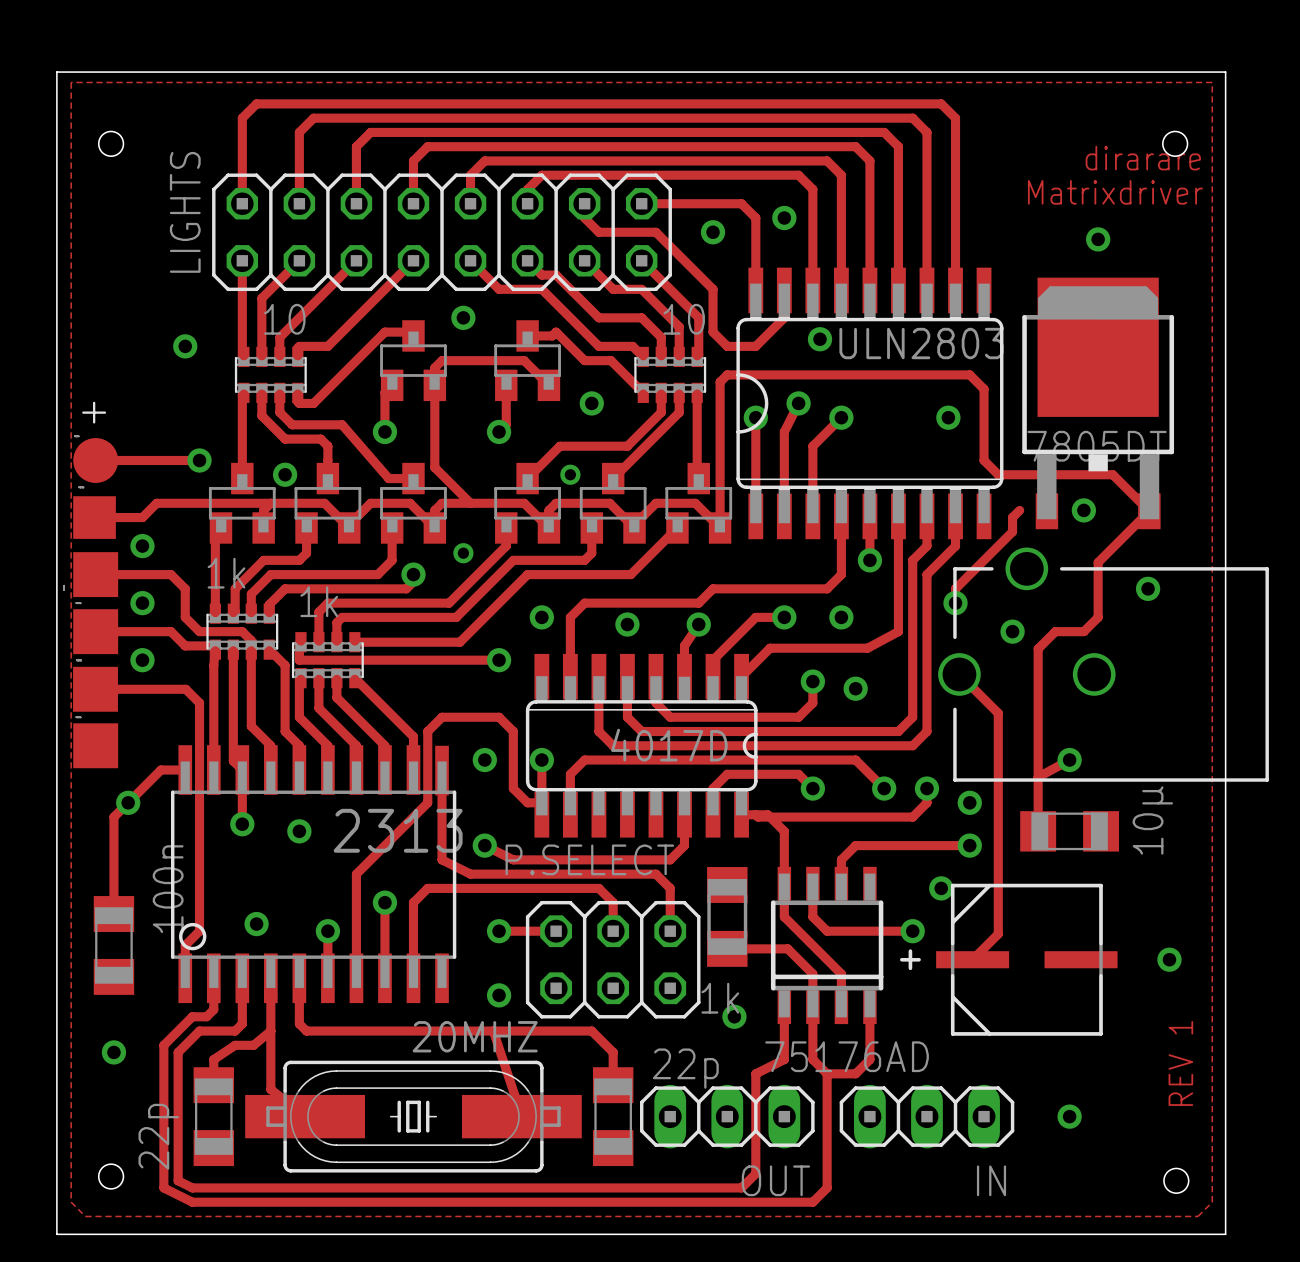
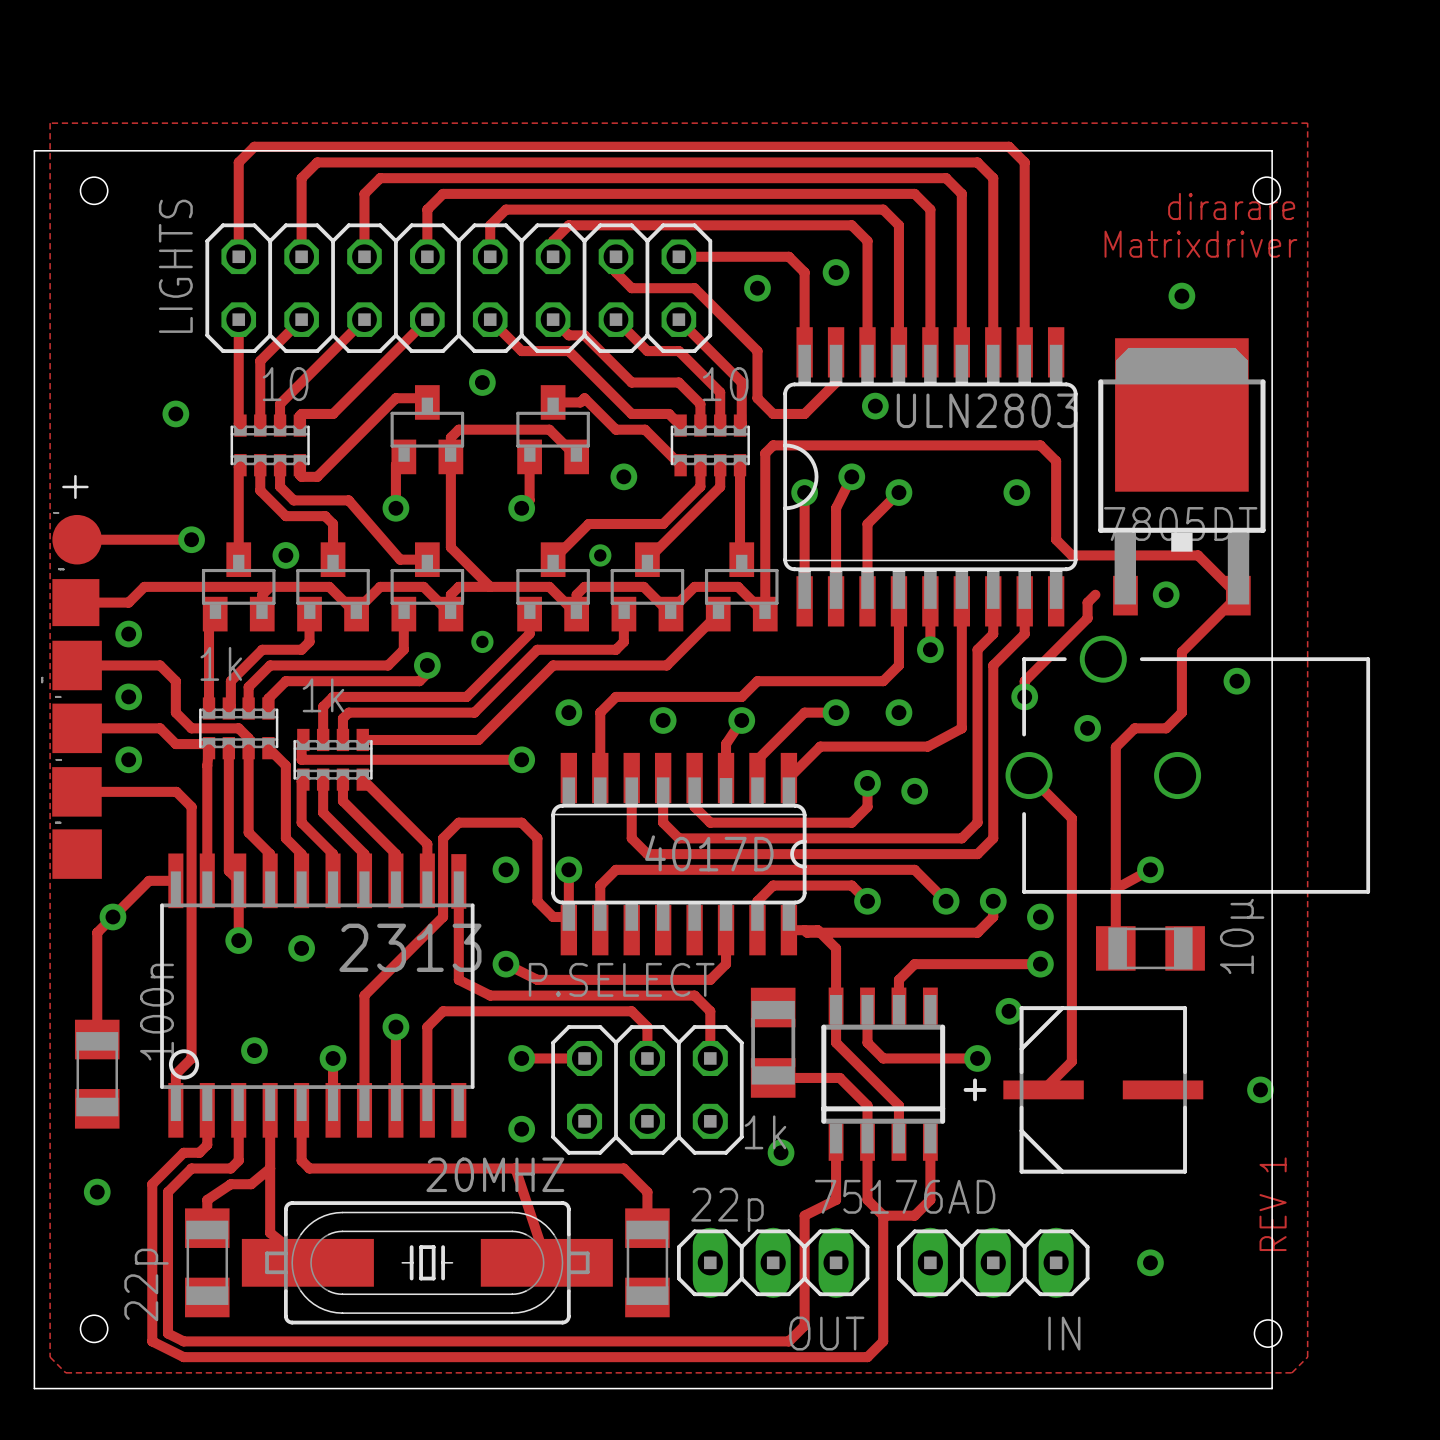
board edge: (56, 107) (56, 72) (1225, 72) (1225, 1234) (56, 1234) (56, 1230) -> (34, 150) (1272, 150) (1272, 1388) (34, 1388)

